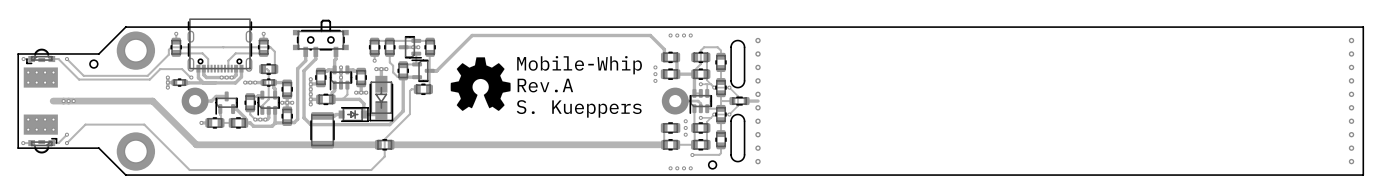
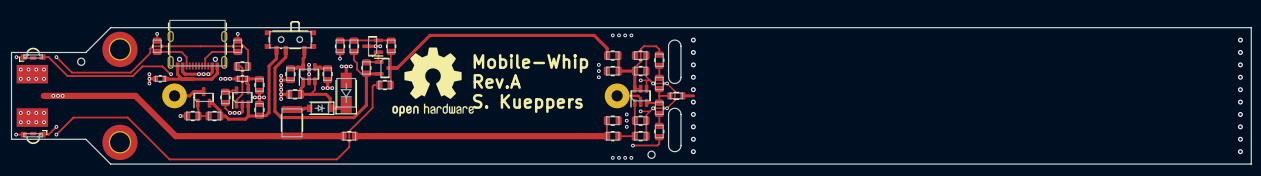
drawing shape: [450, 57, 511, 111] -> [392, 47, 474, 117]

